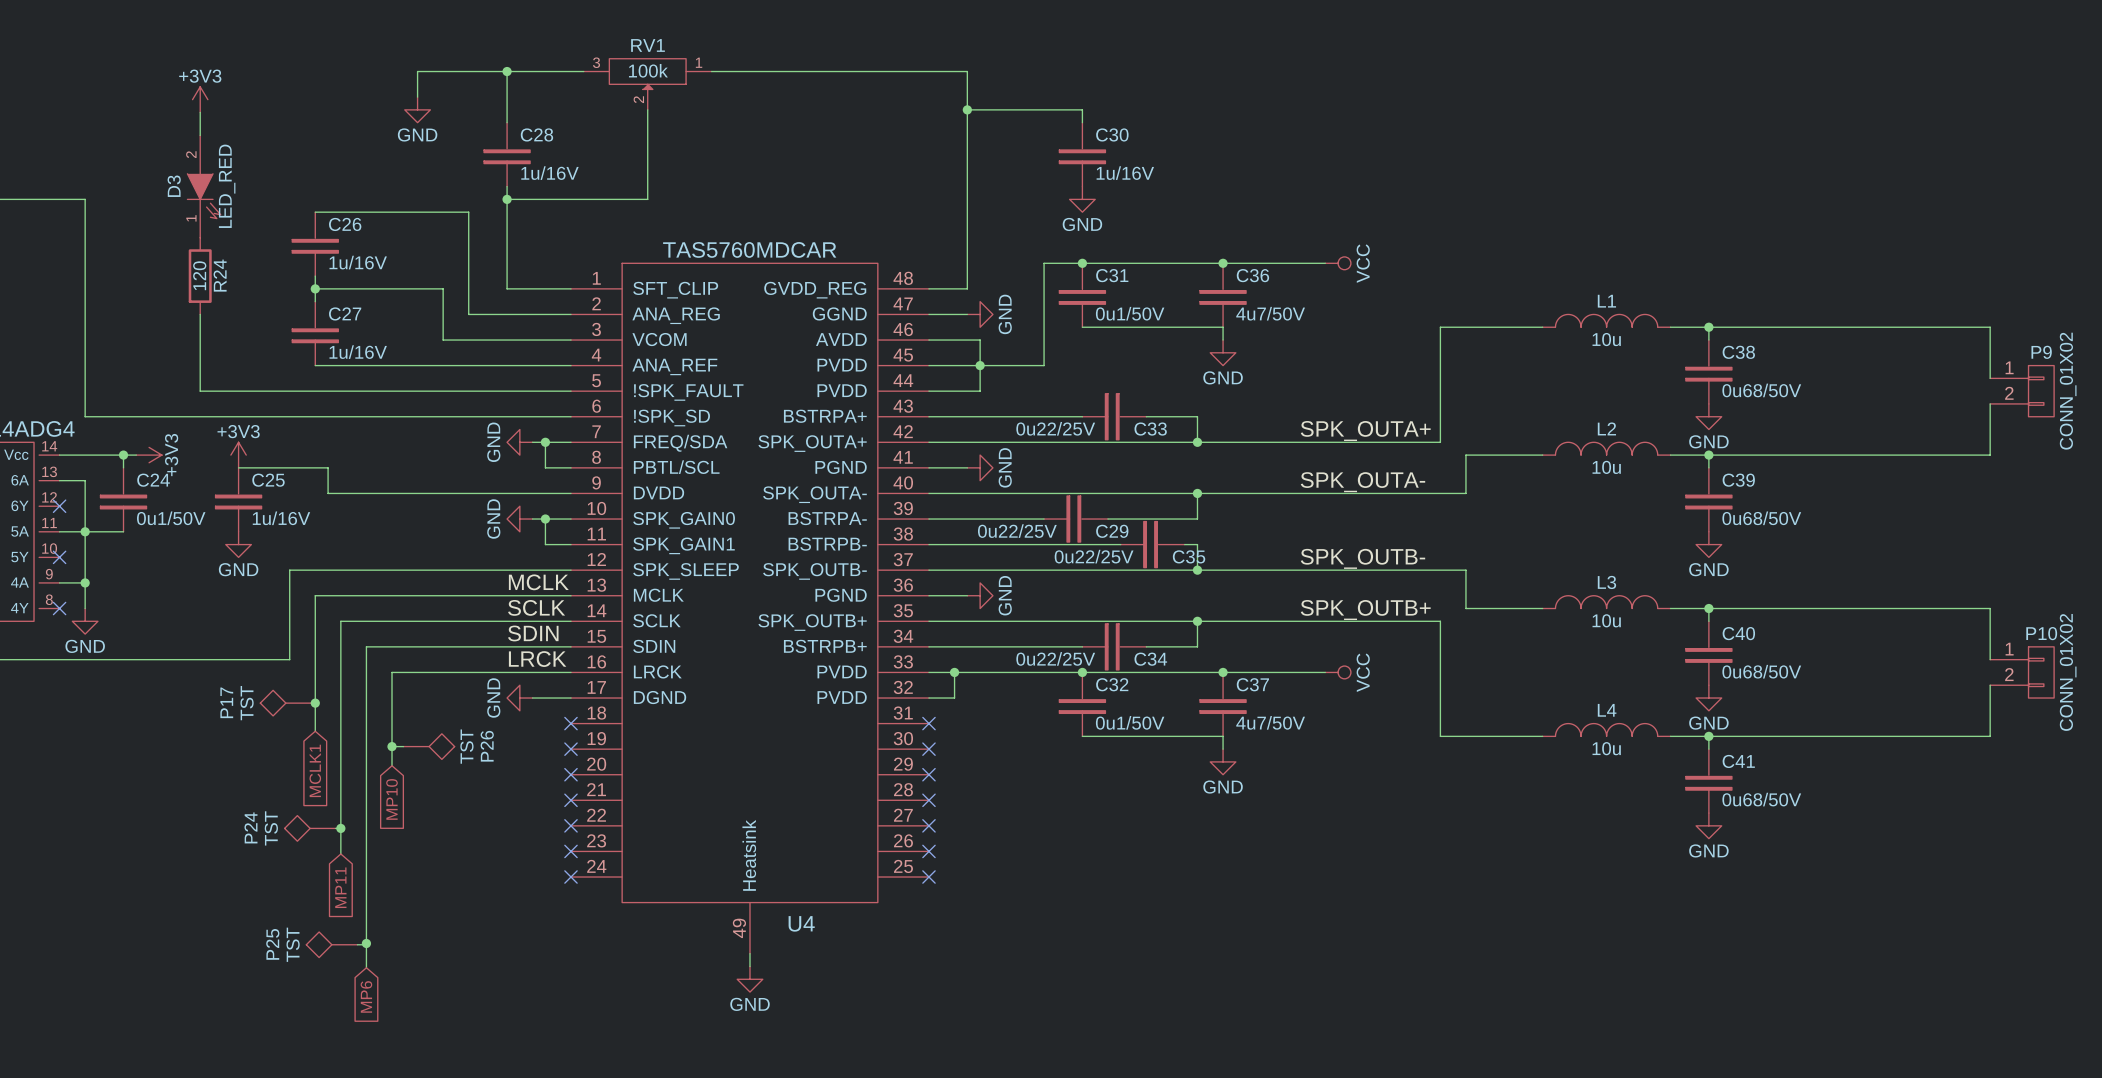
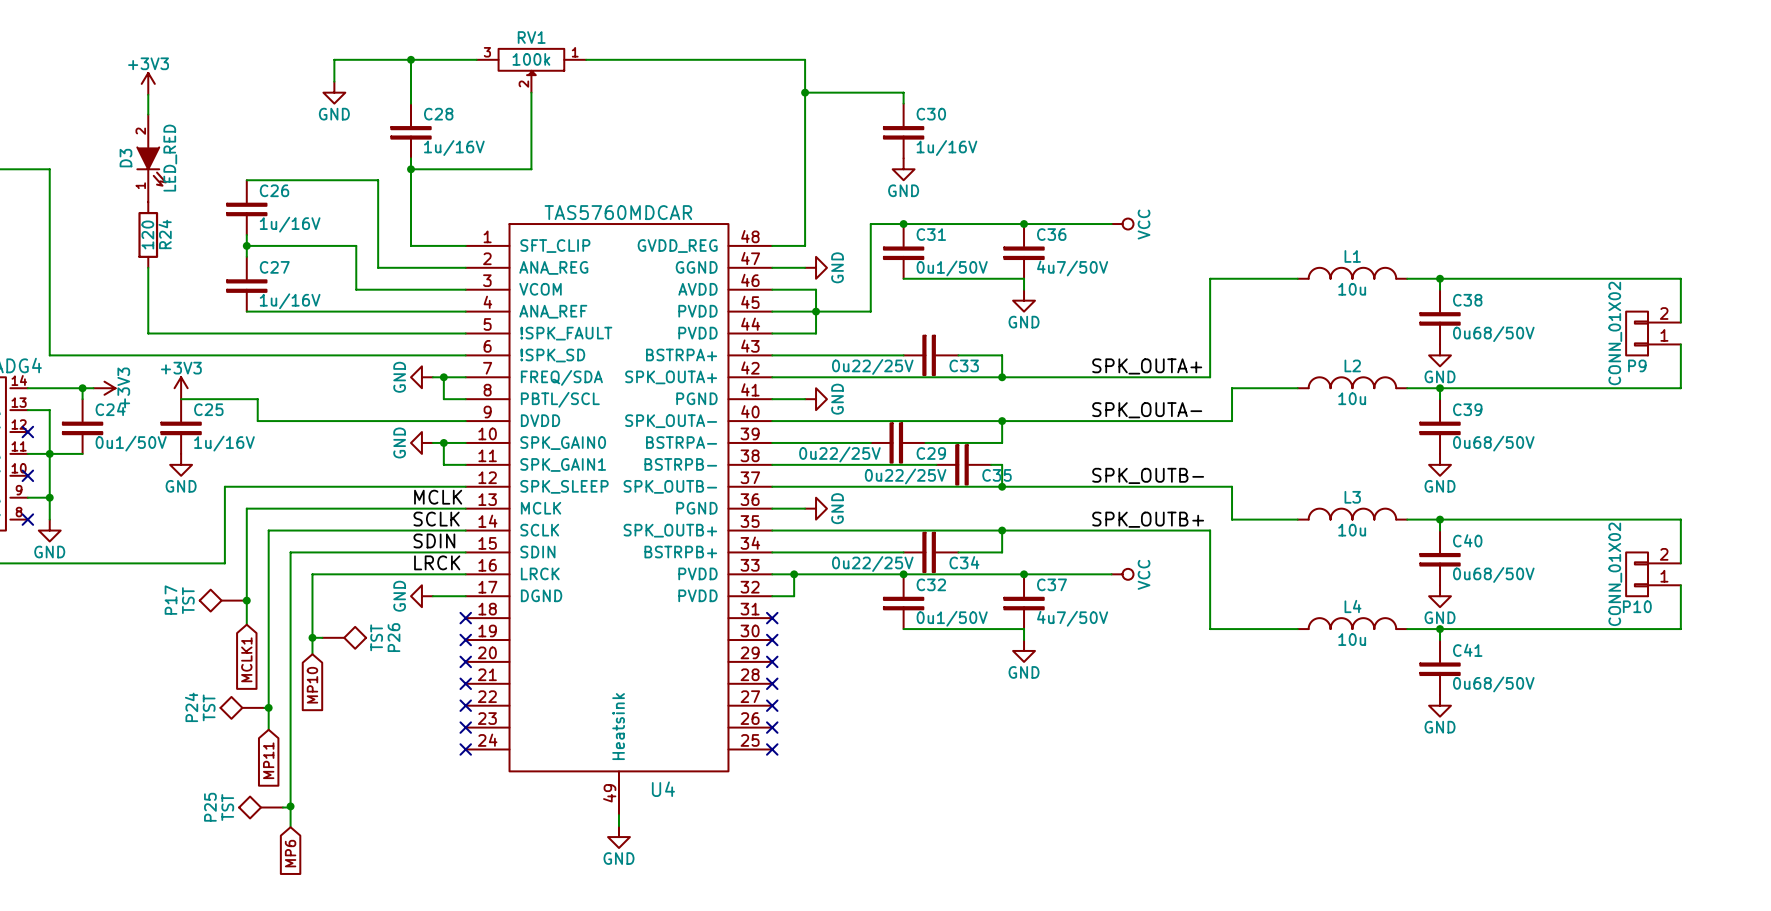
P9 position: (2022, 391) -> (1653, 333)
P9 rotation: 0° (2041, 391) -> 180° (1637, 333)
P10 position: (2022, 672) -> (1653, 574)
P10 rotation: 0° (2041, 672) -> 180° (1637, 574)

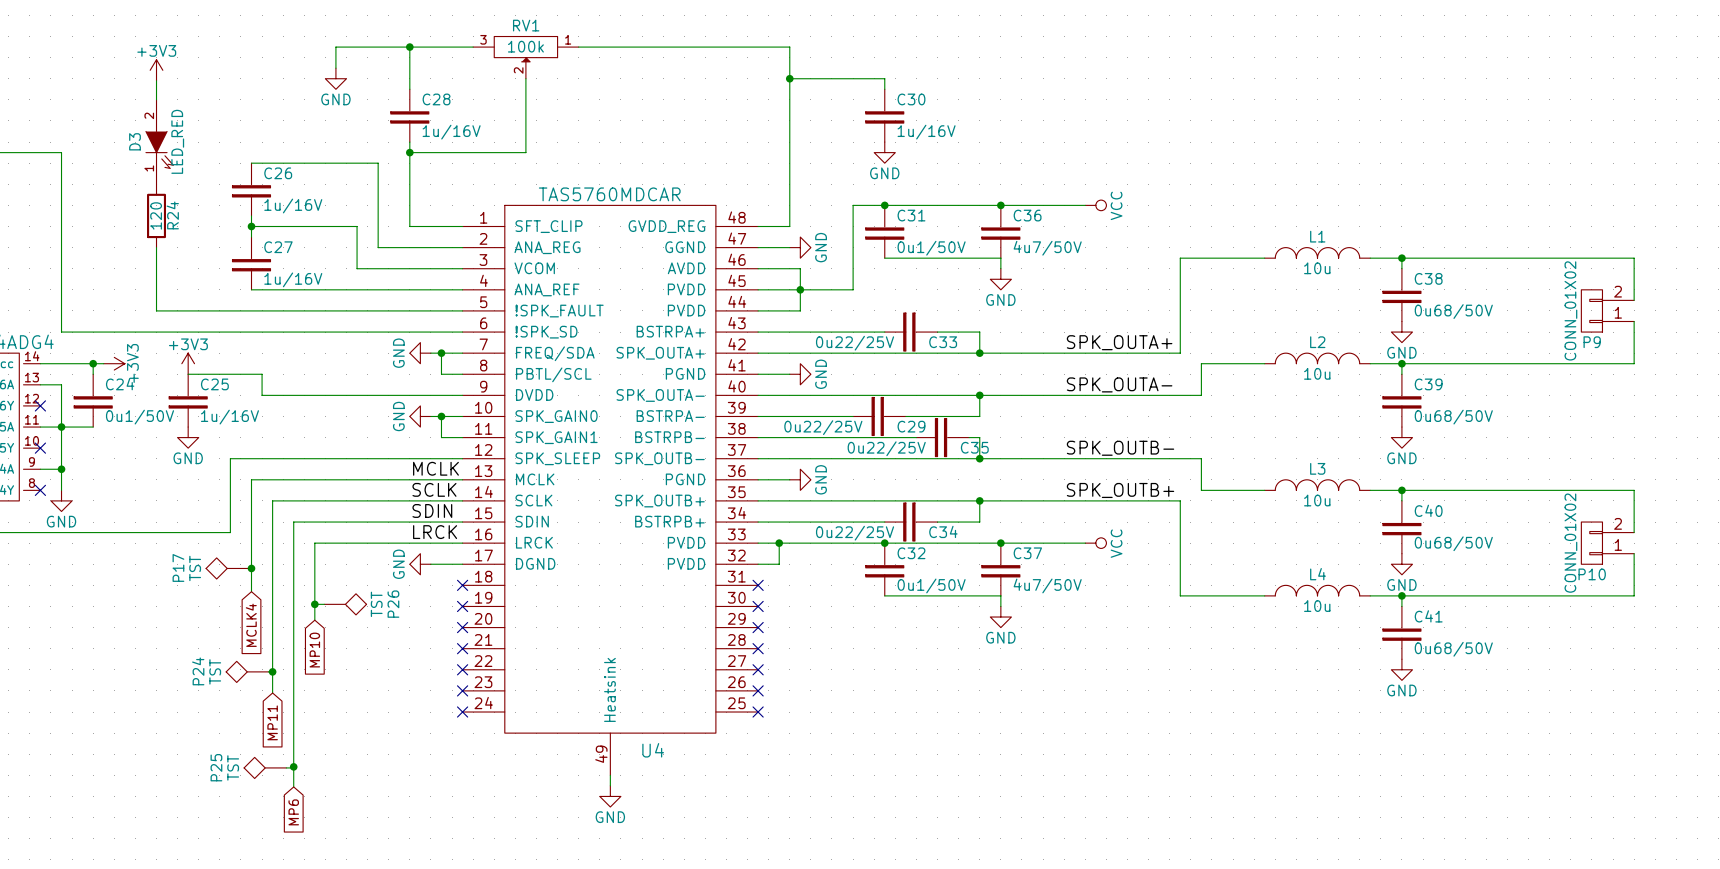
global label: MCLK1 (246, 659) -> MCLK4 (251, 625)

